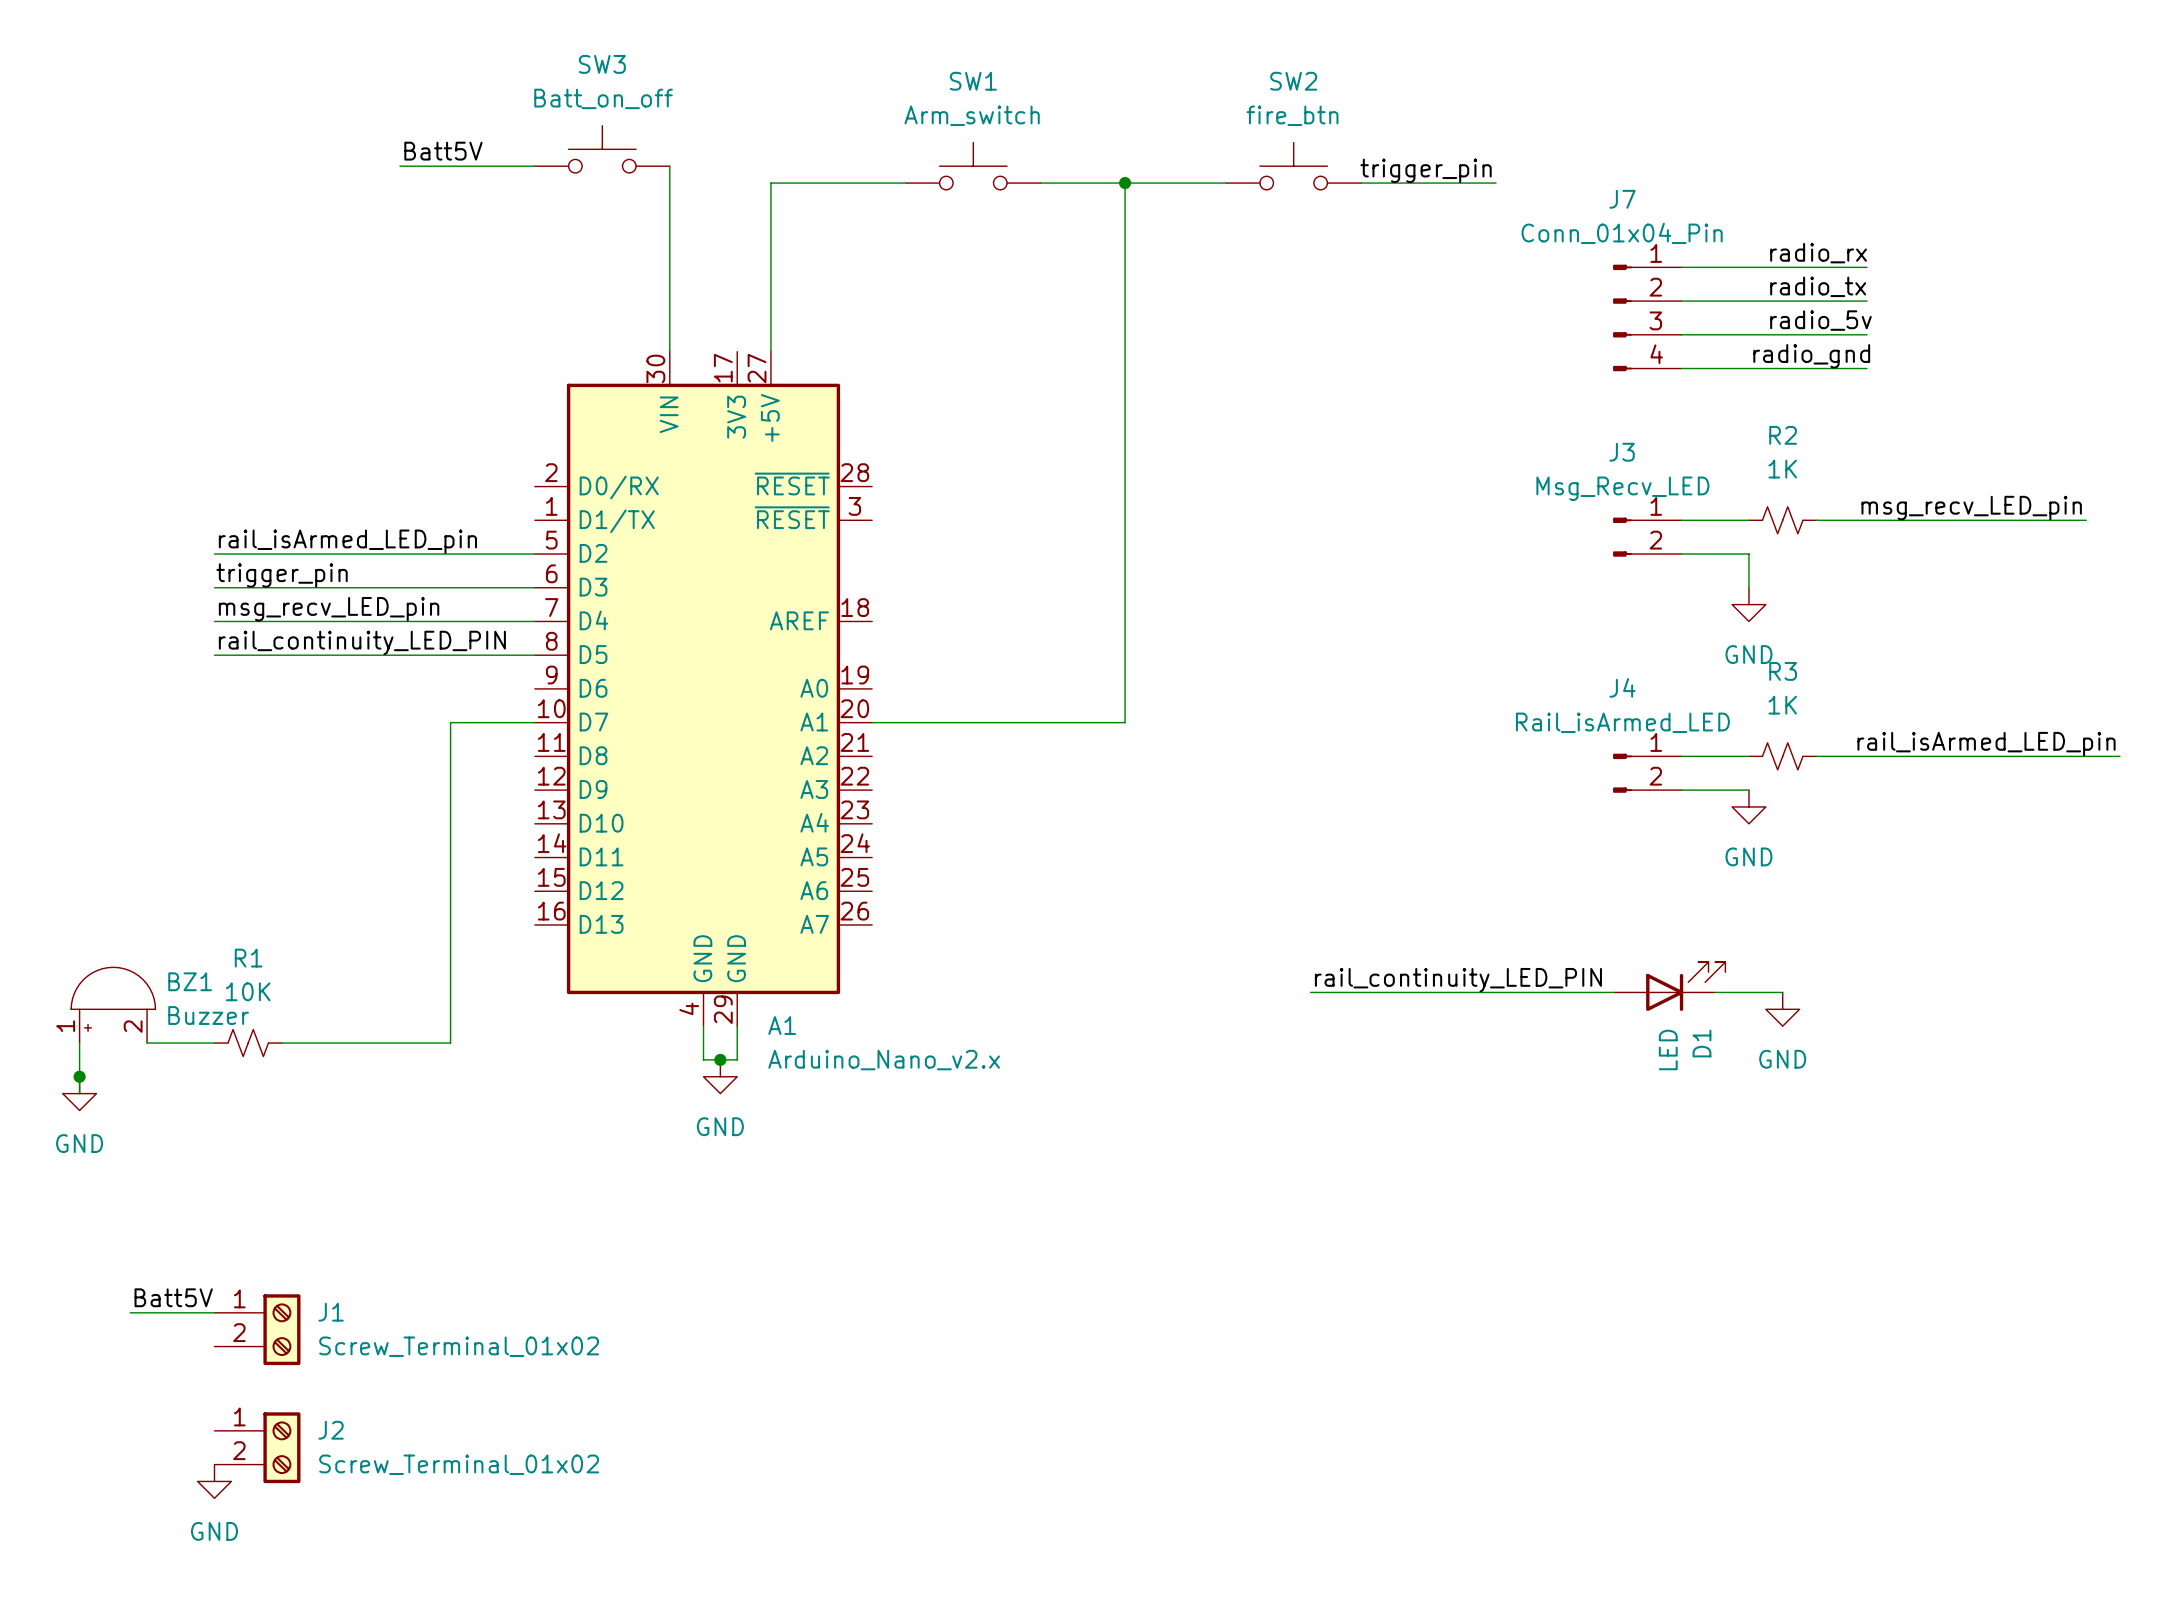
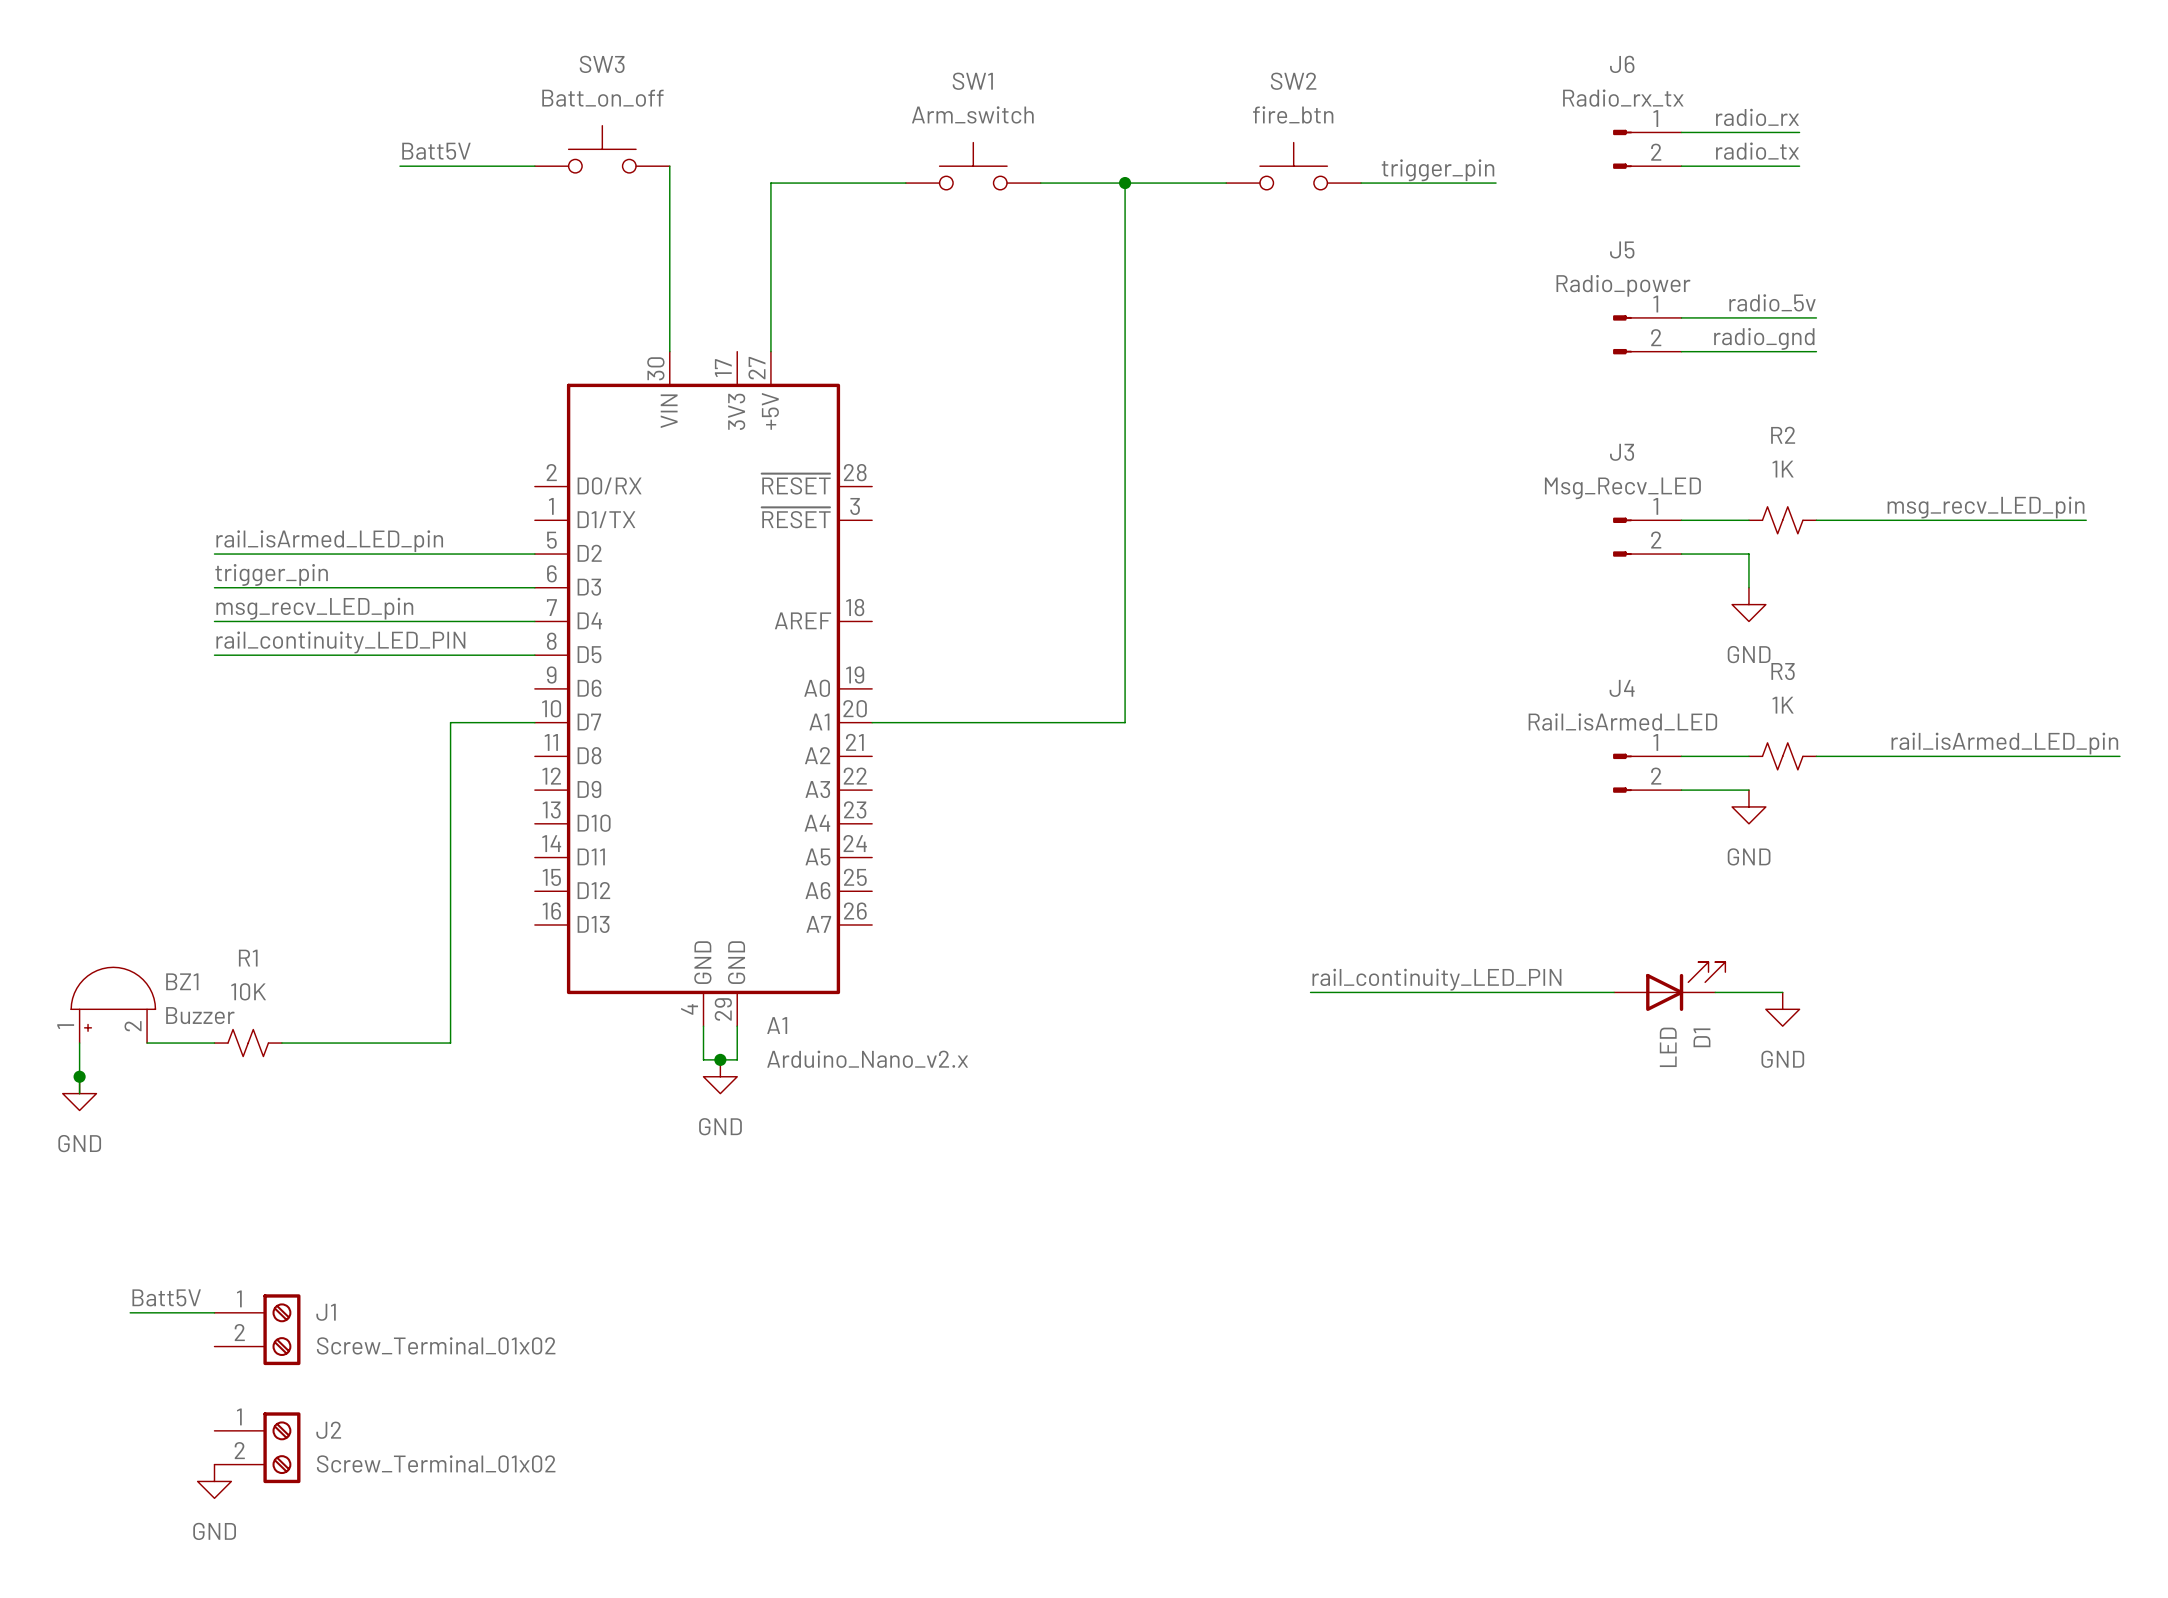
wire: none -> (1681, 132) (1799, 132)
J6: none -> Radio_rx_tx (1647, 149)
wire: none -> (1681, 166) (1799, 166)
label position: radio_rx (1818, 253) -> radio_rx (1757, 117)
wire: (1681, 267) (1867, 267) -> none
label position: radio_tx (1818, 286) -> radio_tx (1757, 151)
wire: (1681, 301) (1867, 301) -> none
J7: Conn_01x04_Pin (1647, 317) -> none
wire: none -> (1681, 317) (1816, 317)
label position: radio_5v (1820, 320) -> radio_5v (1772, 302)
J5: none -> Radio_power (1647, 334)
wire: (1681, 334) (1867, 334) -> none
wire: none -> (1681, 351) (1816, 351)
label position: radio_gnd (1811, 356) -> radio_gnd (1764, 338)
wire: (1681, 368) (1867, 368) -> none

